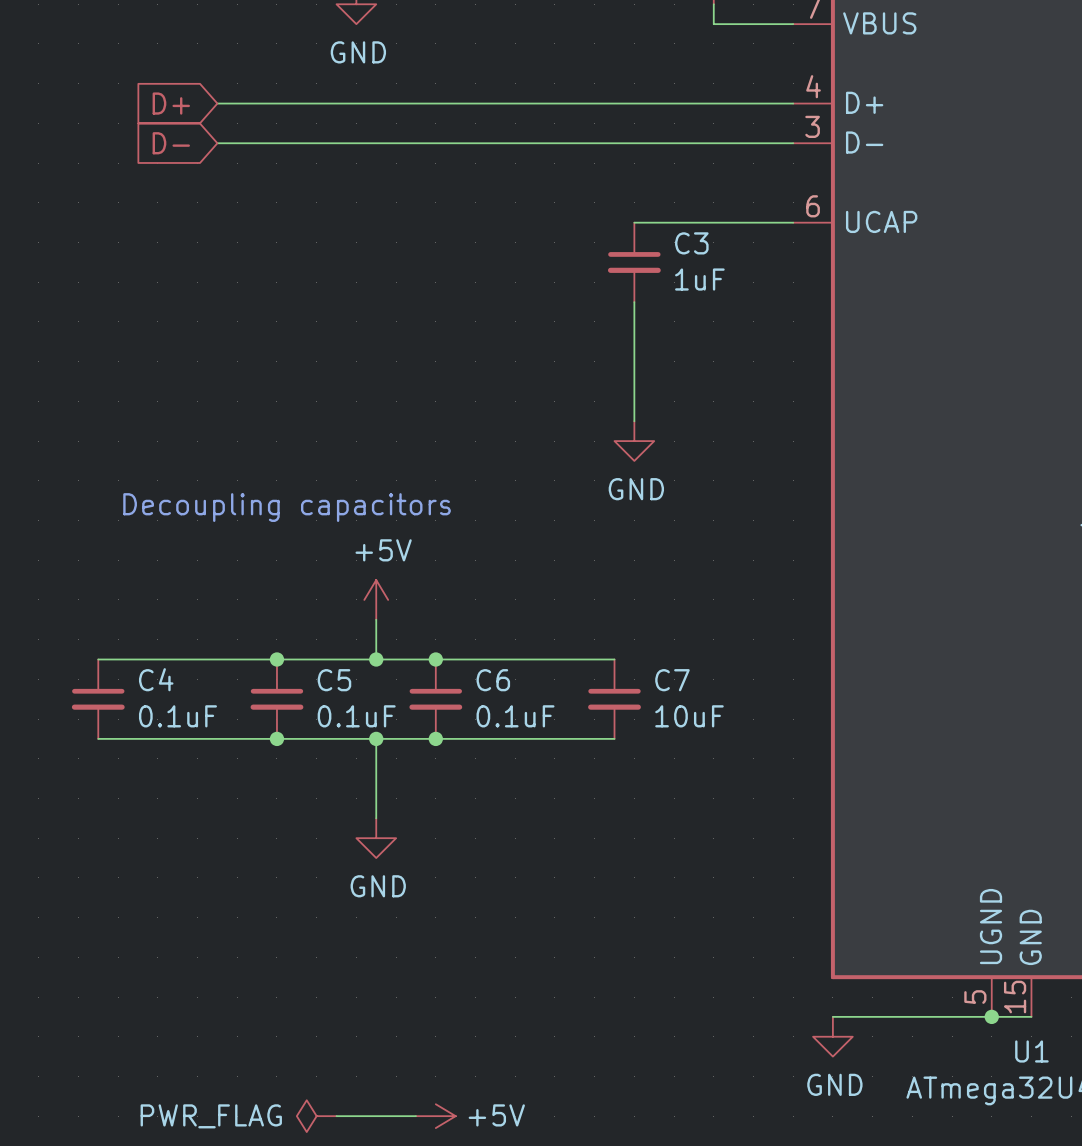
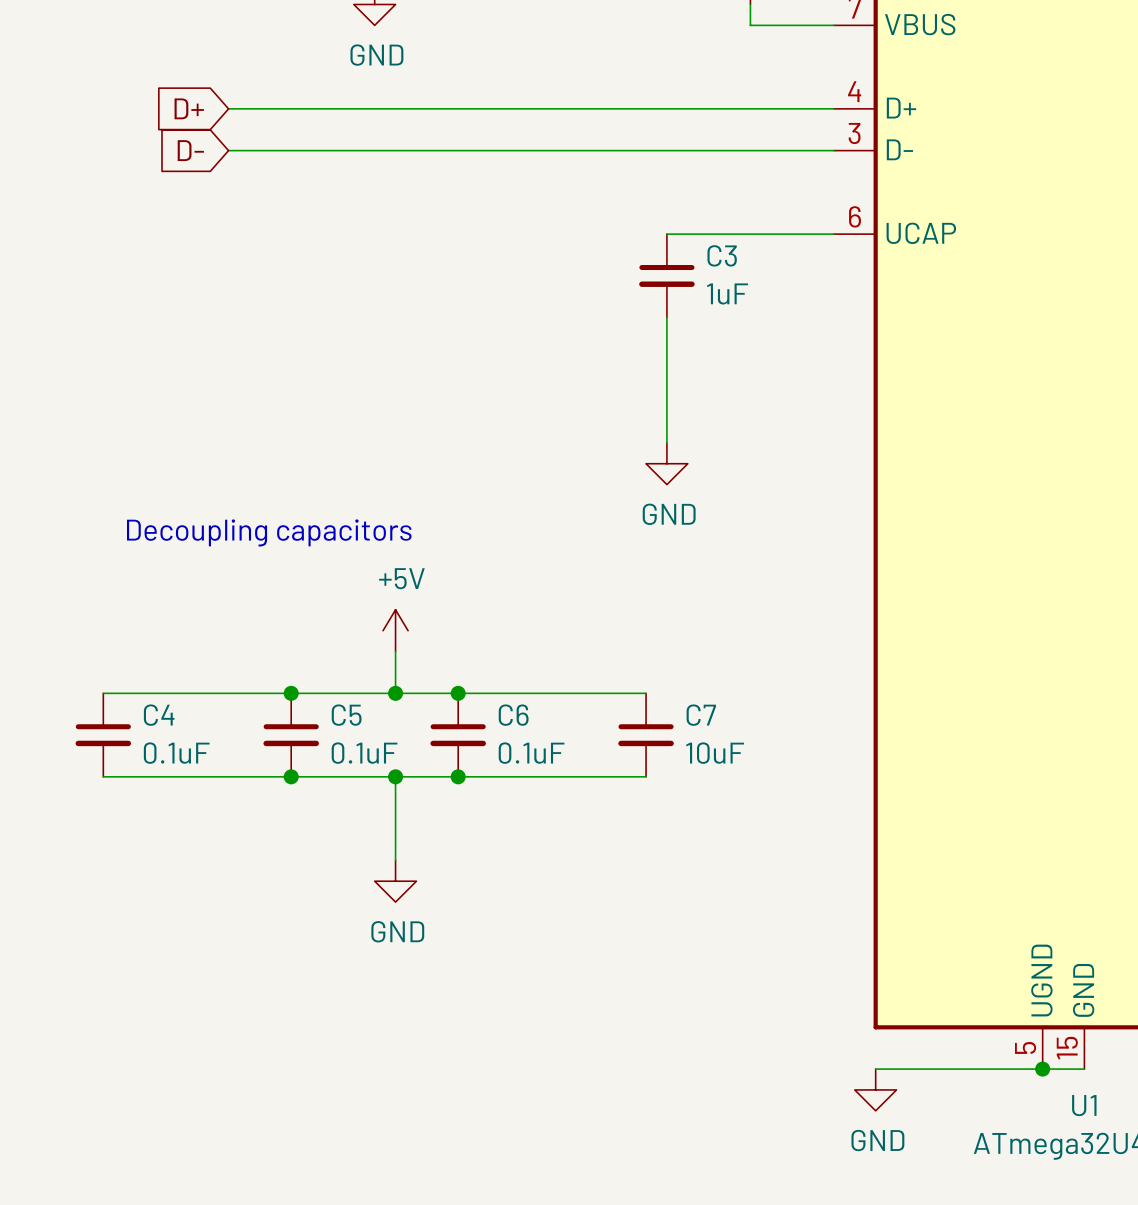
power symbol: PWR_FLAG (316, 1116) -> none
wire: (336, 1116) (415, 1116) -> none
power symbol: +5V (435, 1116) -> none

